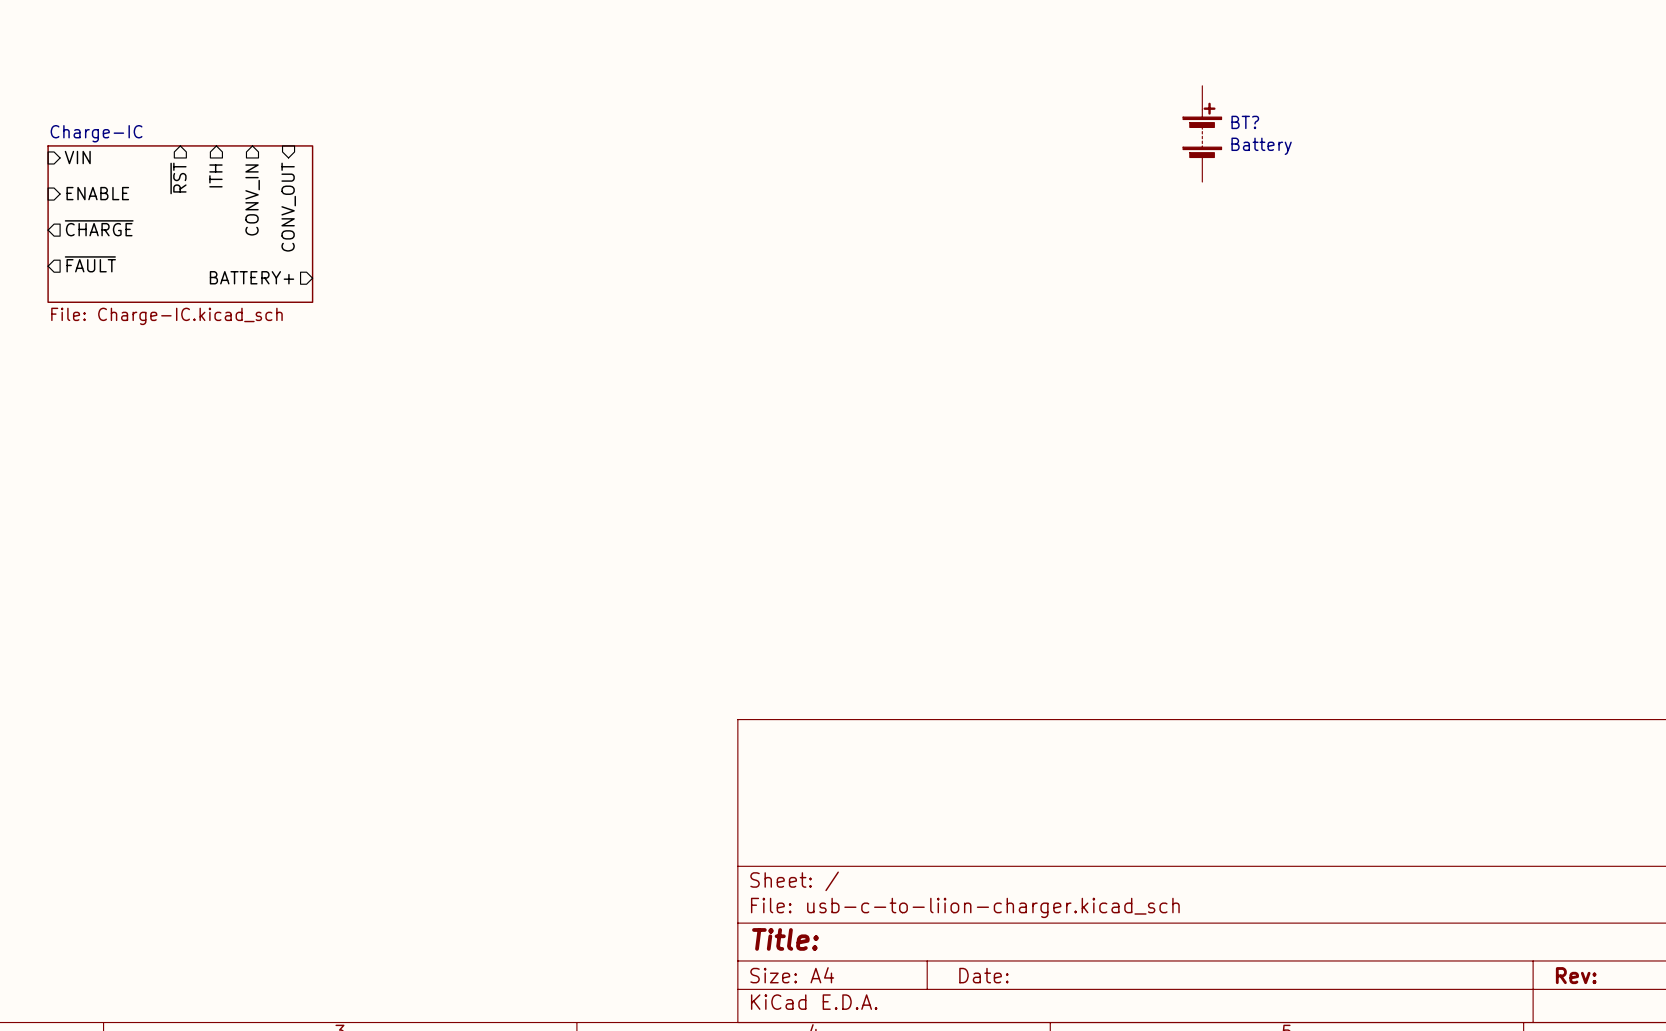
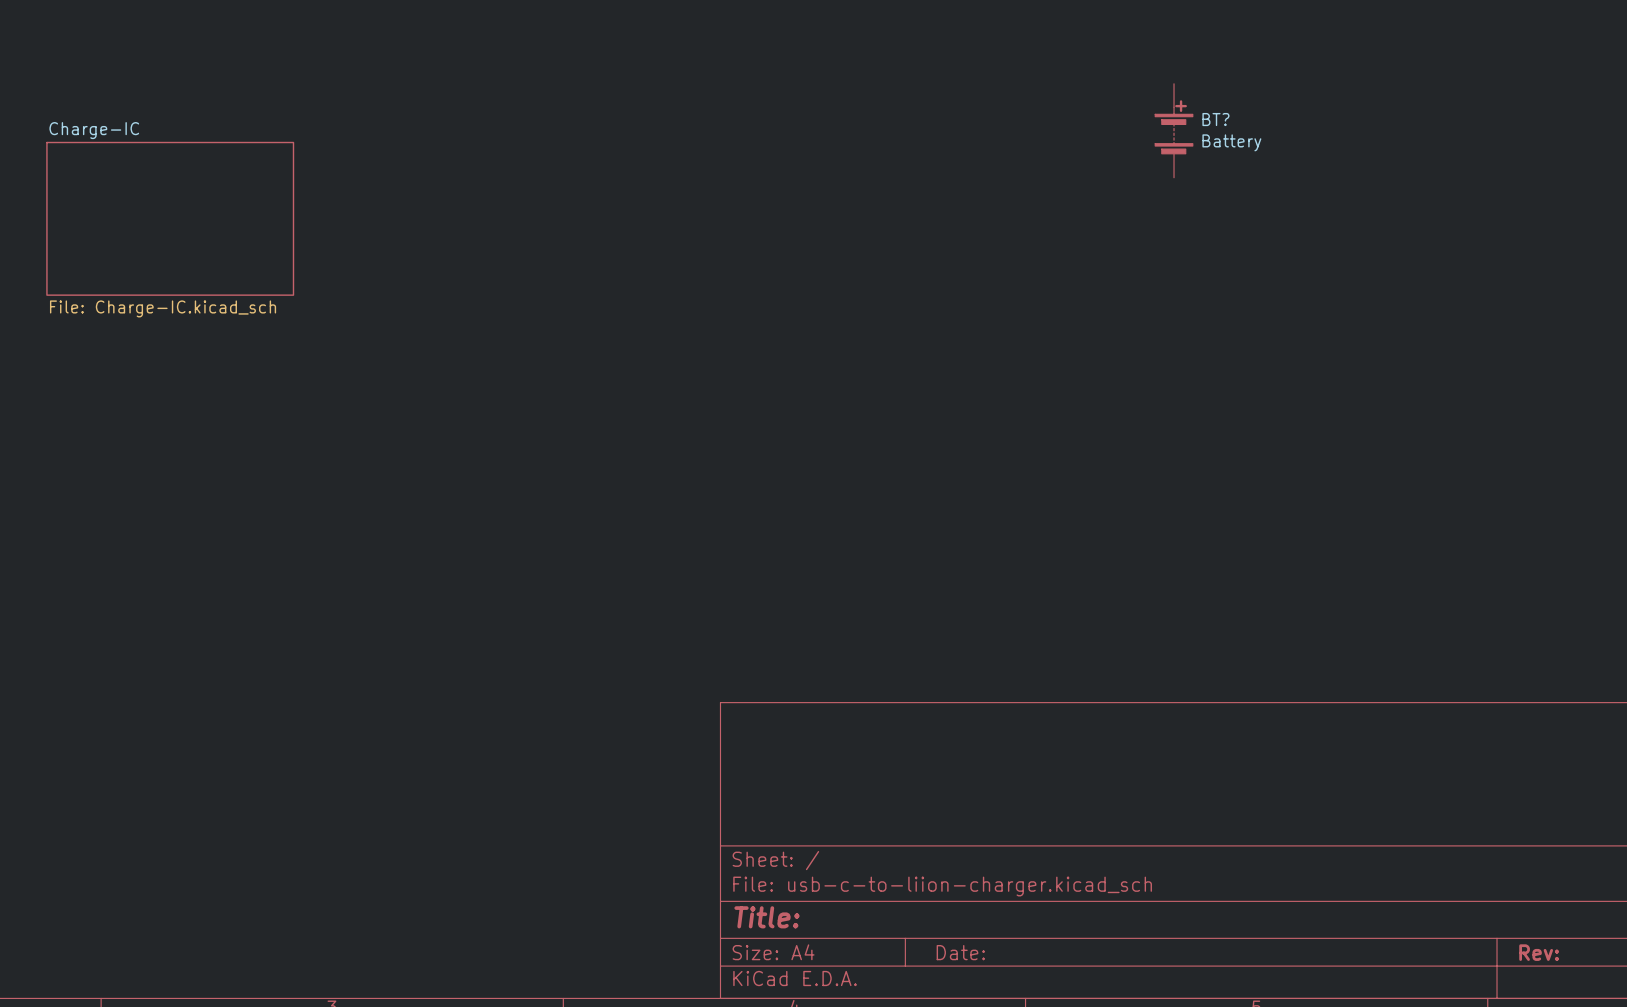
sheet Charge-IC shape: [47, 145, 314, 303] -> [46, 141, 295, 296]
sheet pin: VIN (77, 157) -> none
sheet pin: ITH (215, 175) -> none
sheet pin: ~{RST} (178, 178) -> none
sheet pin: ENABLE (97, 193) -> none
sheet pin: CONV_IN (252, 199) -> none
sheet pin: CONV_OUT (288, 207) -> none
sheet pin: ~{CHARGE} (99, 228) -> none
sheet pin: ~{FAULT} (90, 264) -> none
sheet pin: BATTERY+ (252, 277) -> none

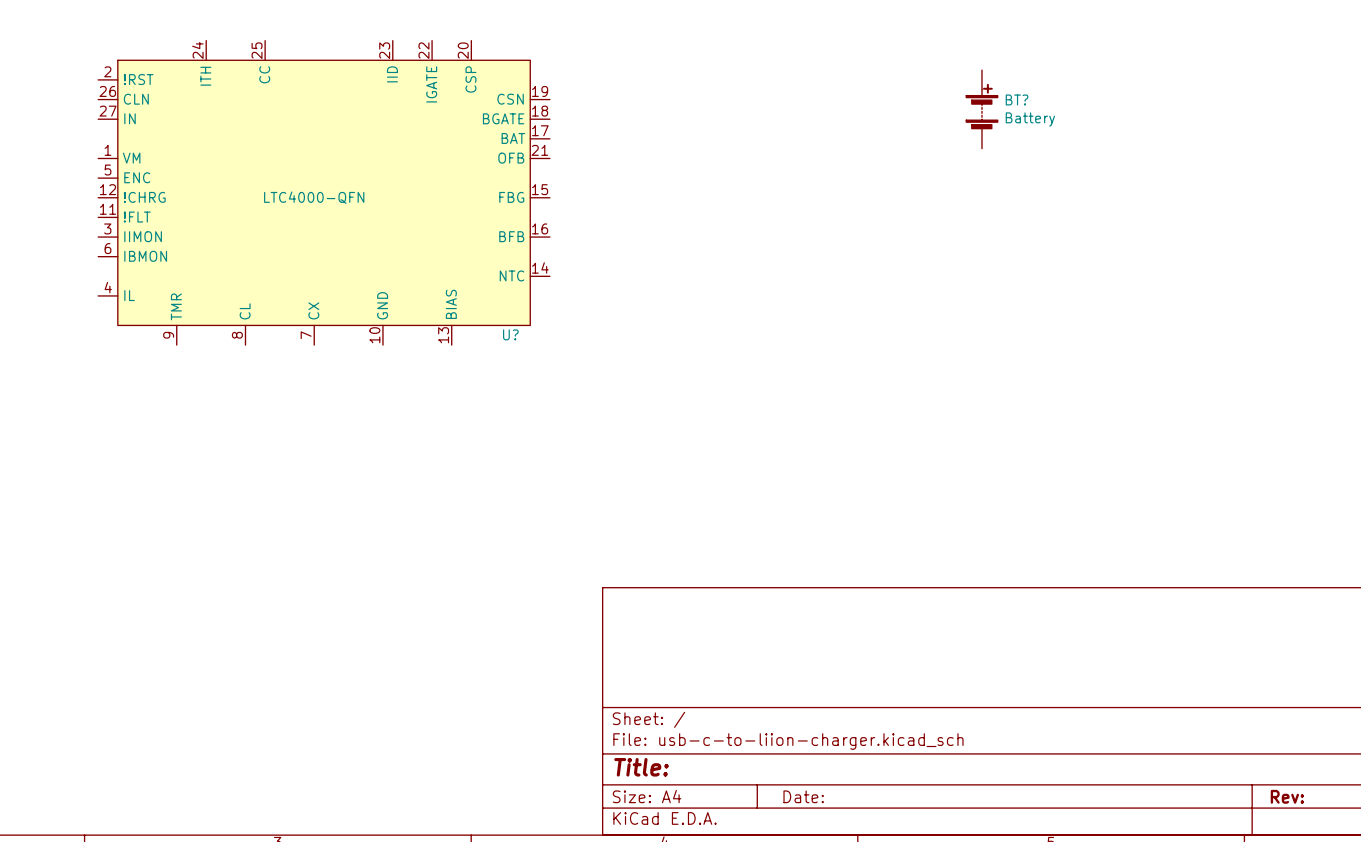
sheet Charge-IC: File: Charge-IC.kicad_sch (170, 218) -> none
U?: none -> LTC4000-QFN (324, 192)

